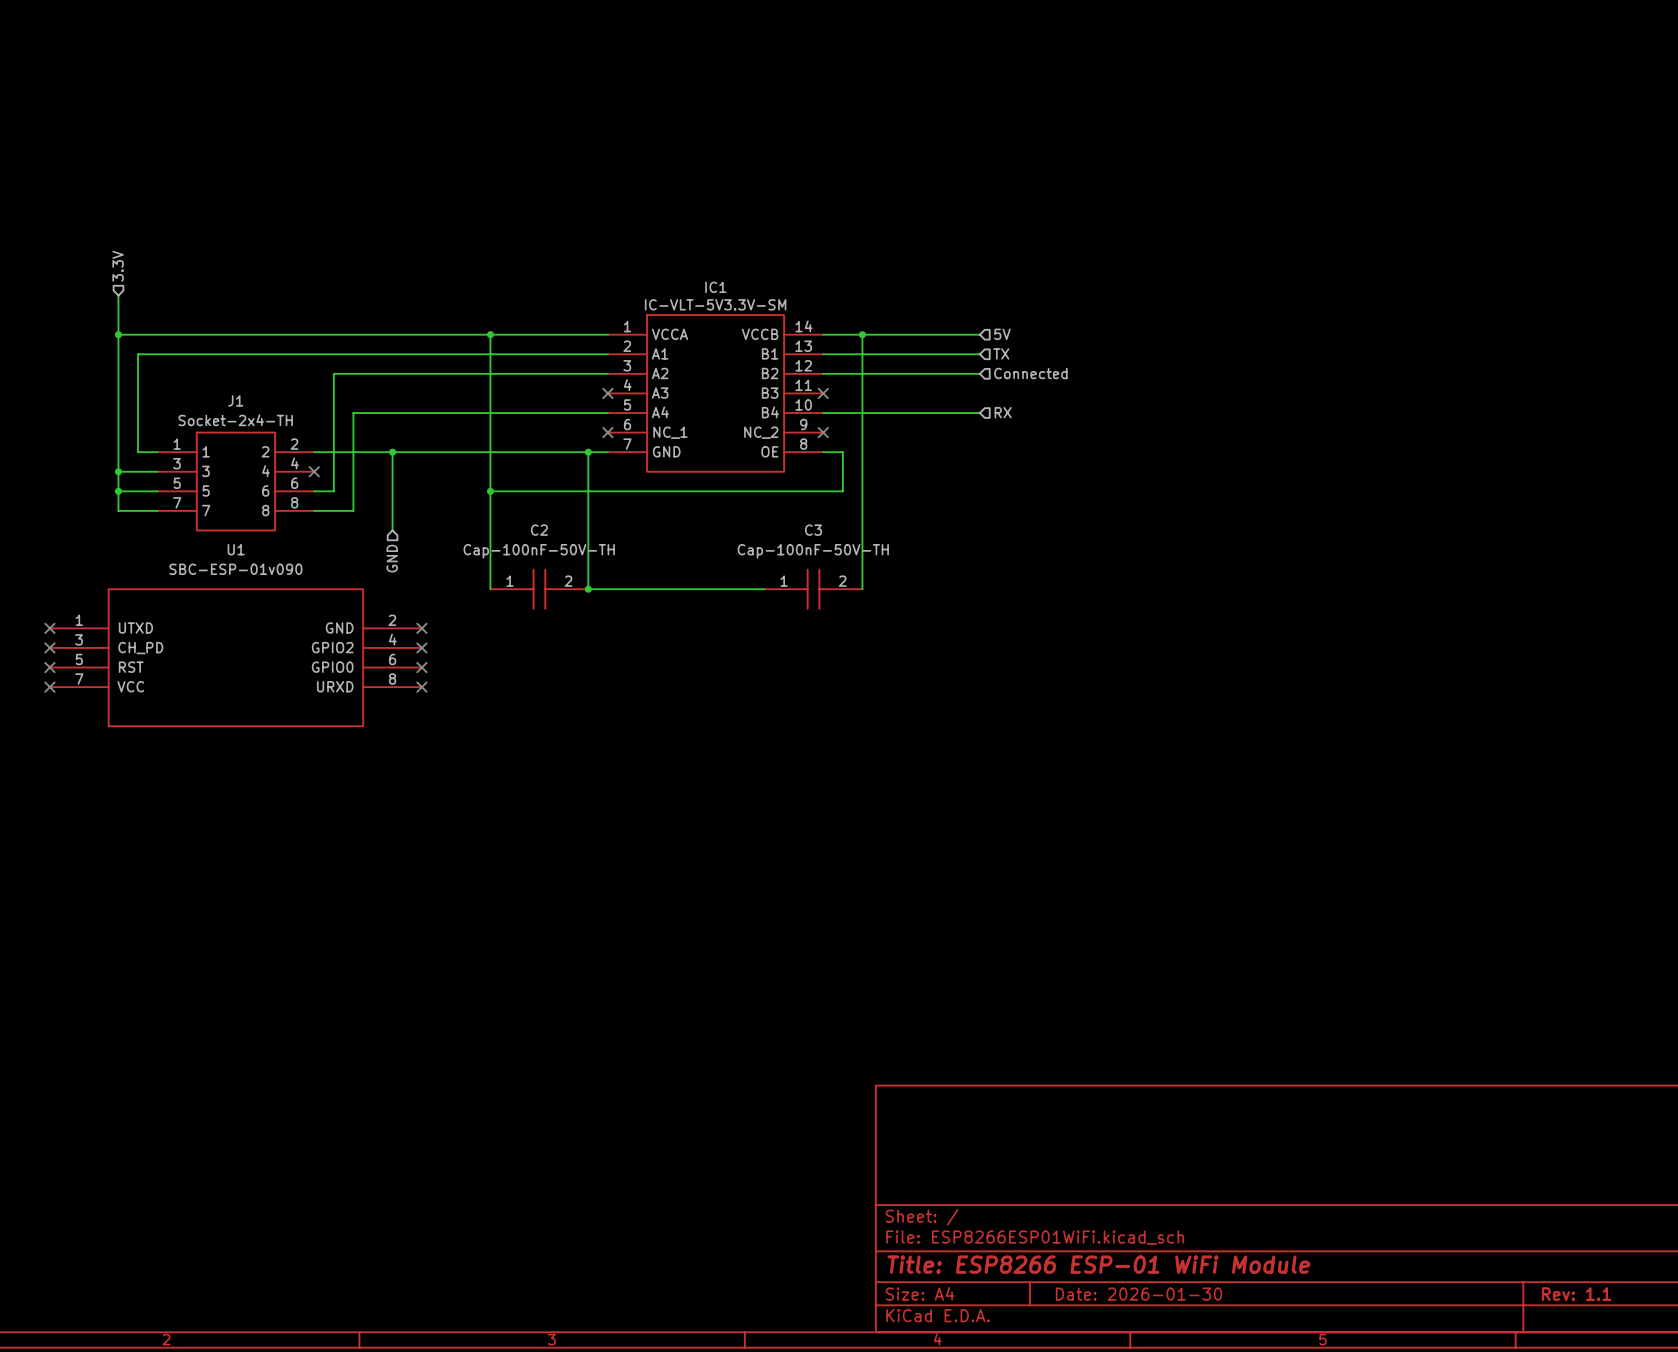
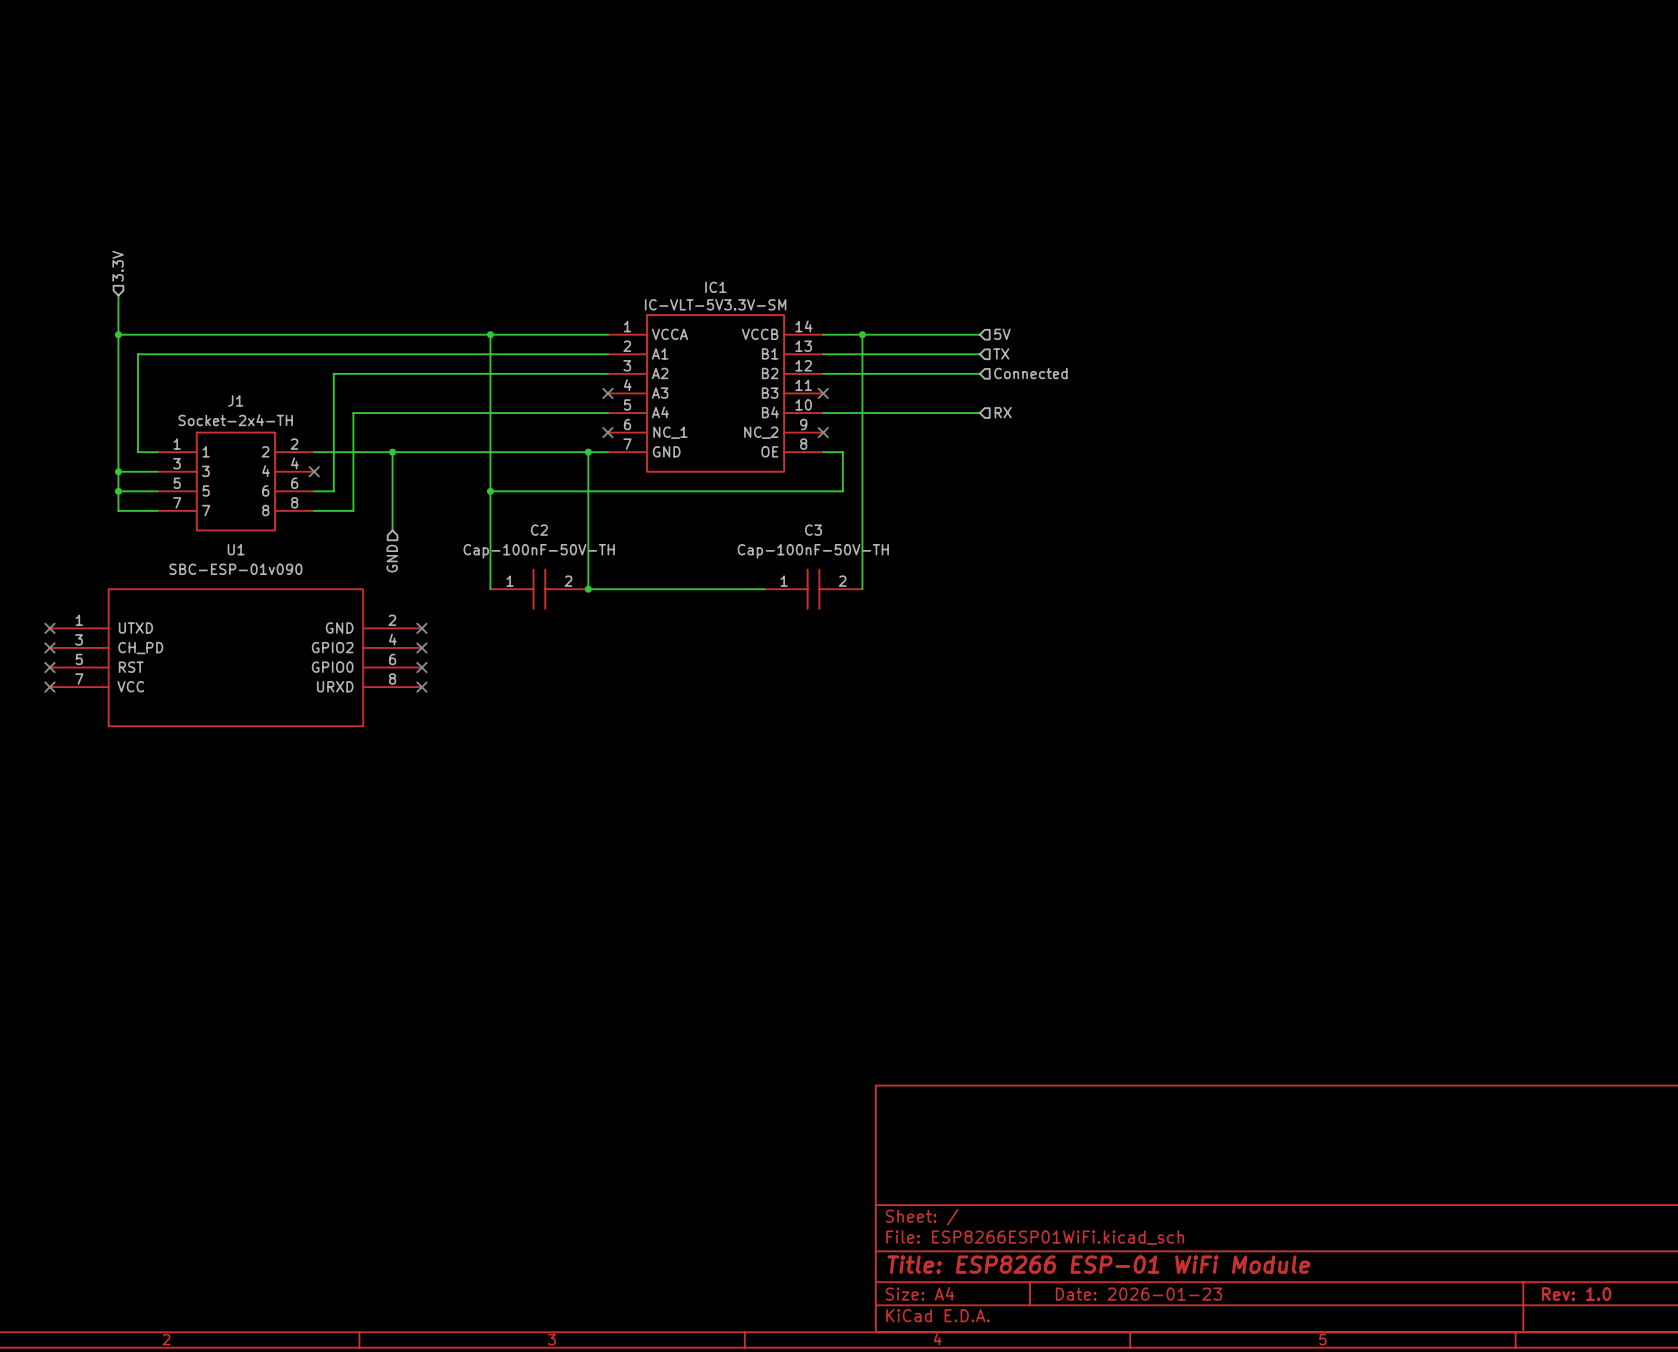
title block: Date: 2026-01-30 (1138, 1294) -> Date: 2026-01-23 (1138, 1294)
title block: Rev: 1.1 (1576, 1294) -> Rev: 1.0 (1576, 1294)

